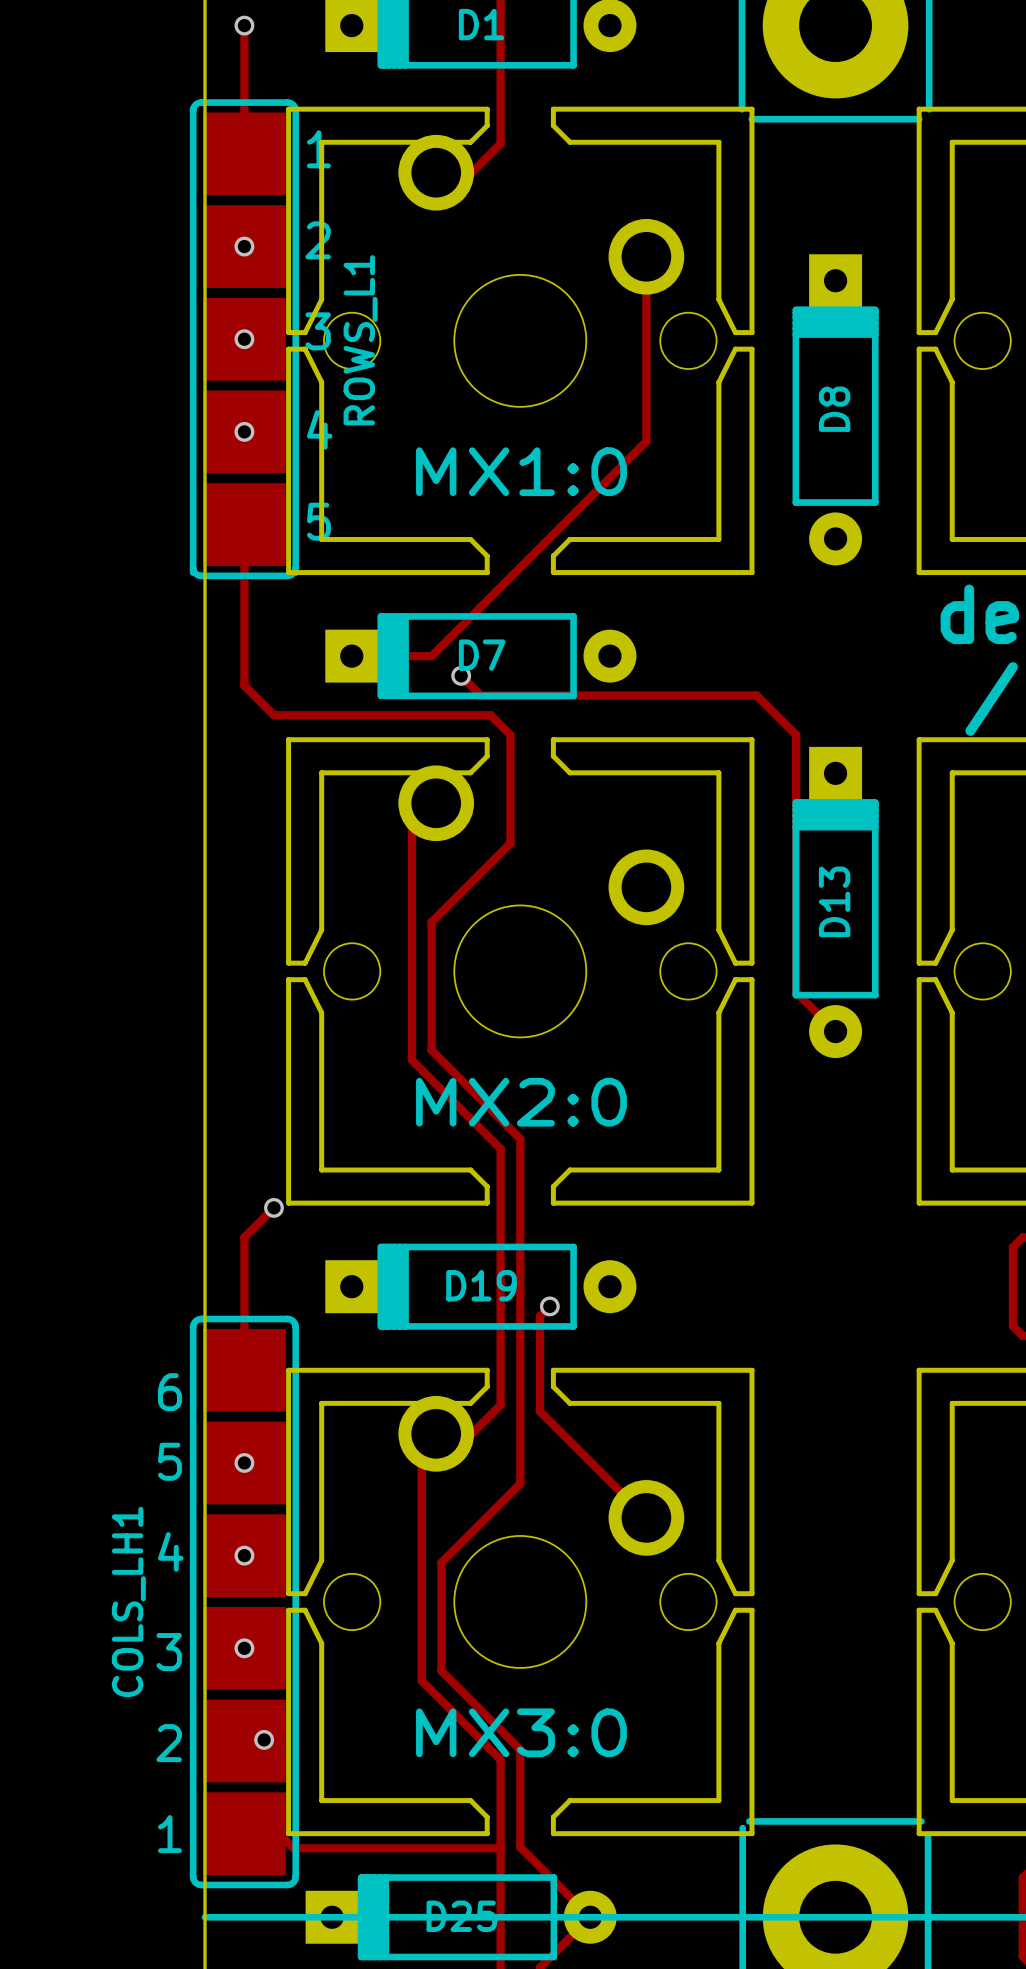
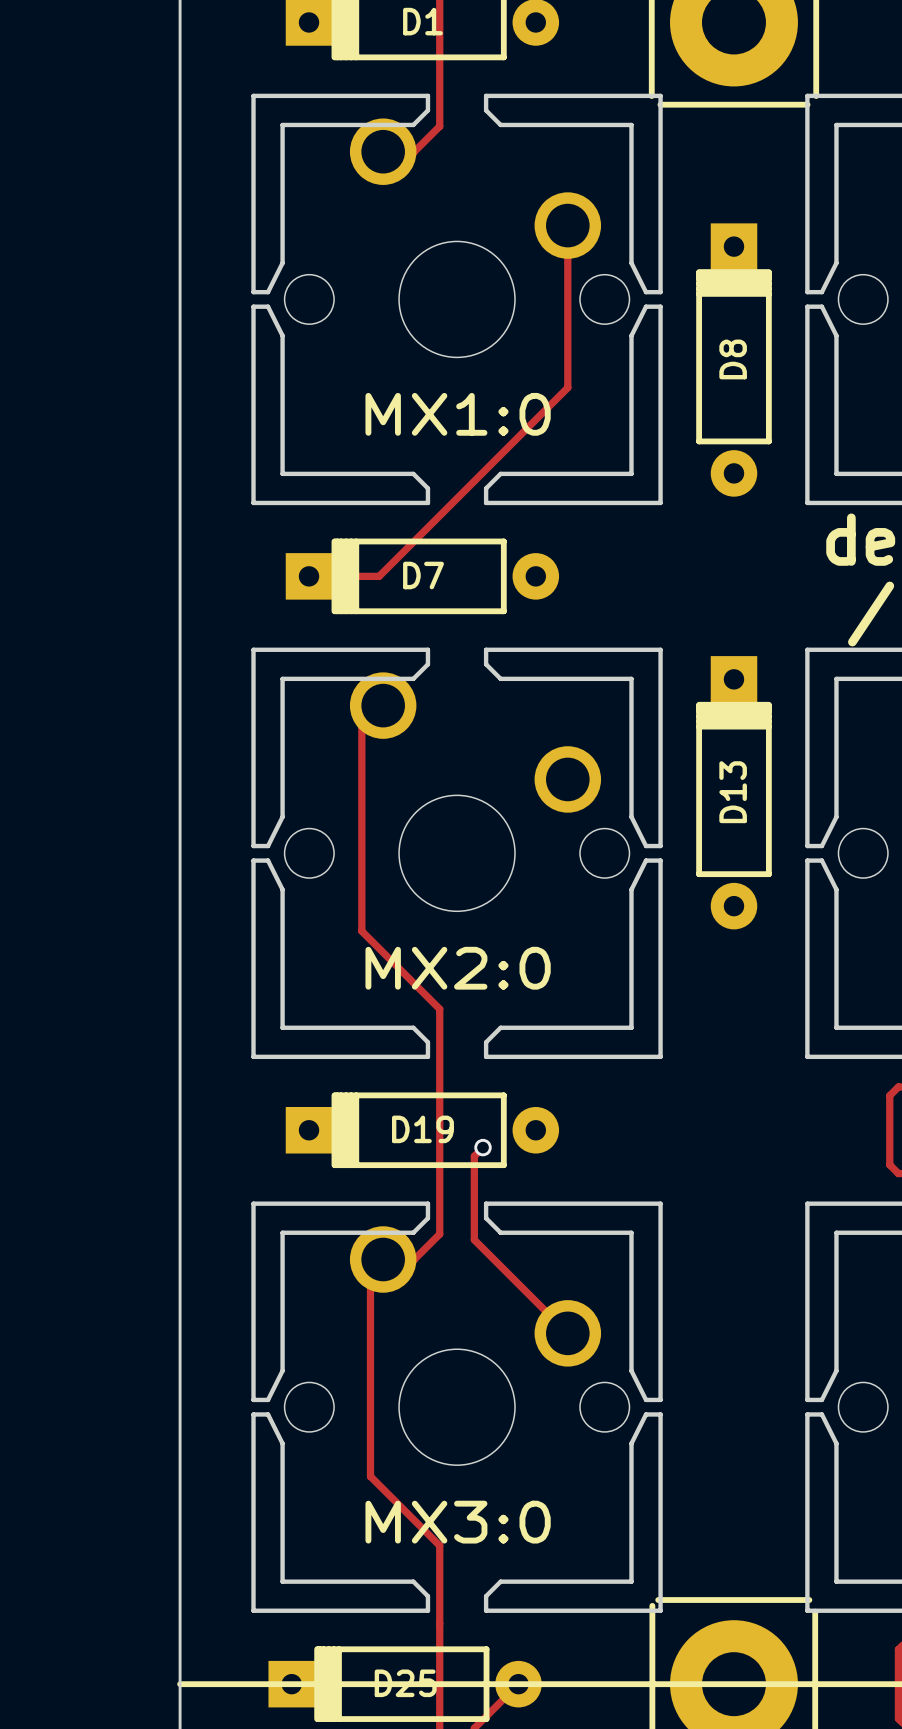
track: (244, 25) (244, 153) -> none
via: (244, 25) -> none
via: (244, 246) -> none
ROWS_L1: (244, 339) -> none
via: (244, 339) -> none
via: (244, 431) -> none
track: (244, 524) (244, 685) (273, 715) (490, 715) (510, 734) (510, 843) (431, 922) (431, 1050) (520, 1138) (520, 1483) (441, 1562) (441, 1670) (520, 1749) (520, 1847) (590, 1917) -> none
track: (461, 675) (480, 695) (756, 695) (796, 734) (796, 992) (835, 1031) -> none
via: (461, 675) -> none
track: (273, 1207) (244, 1237) (244, 1370) -> none
via: (273, 1207) -> none
via: (244, 1462) -> none
via: (244, 1555) -> none
COLS_LH1: (244, 1601) -> none
via: (244, 1648) -> none
via: (264, 1739) -> none
track: (244, 1833) (279, 1833) (293, 1848) (500, 1848) -> none

